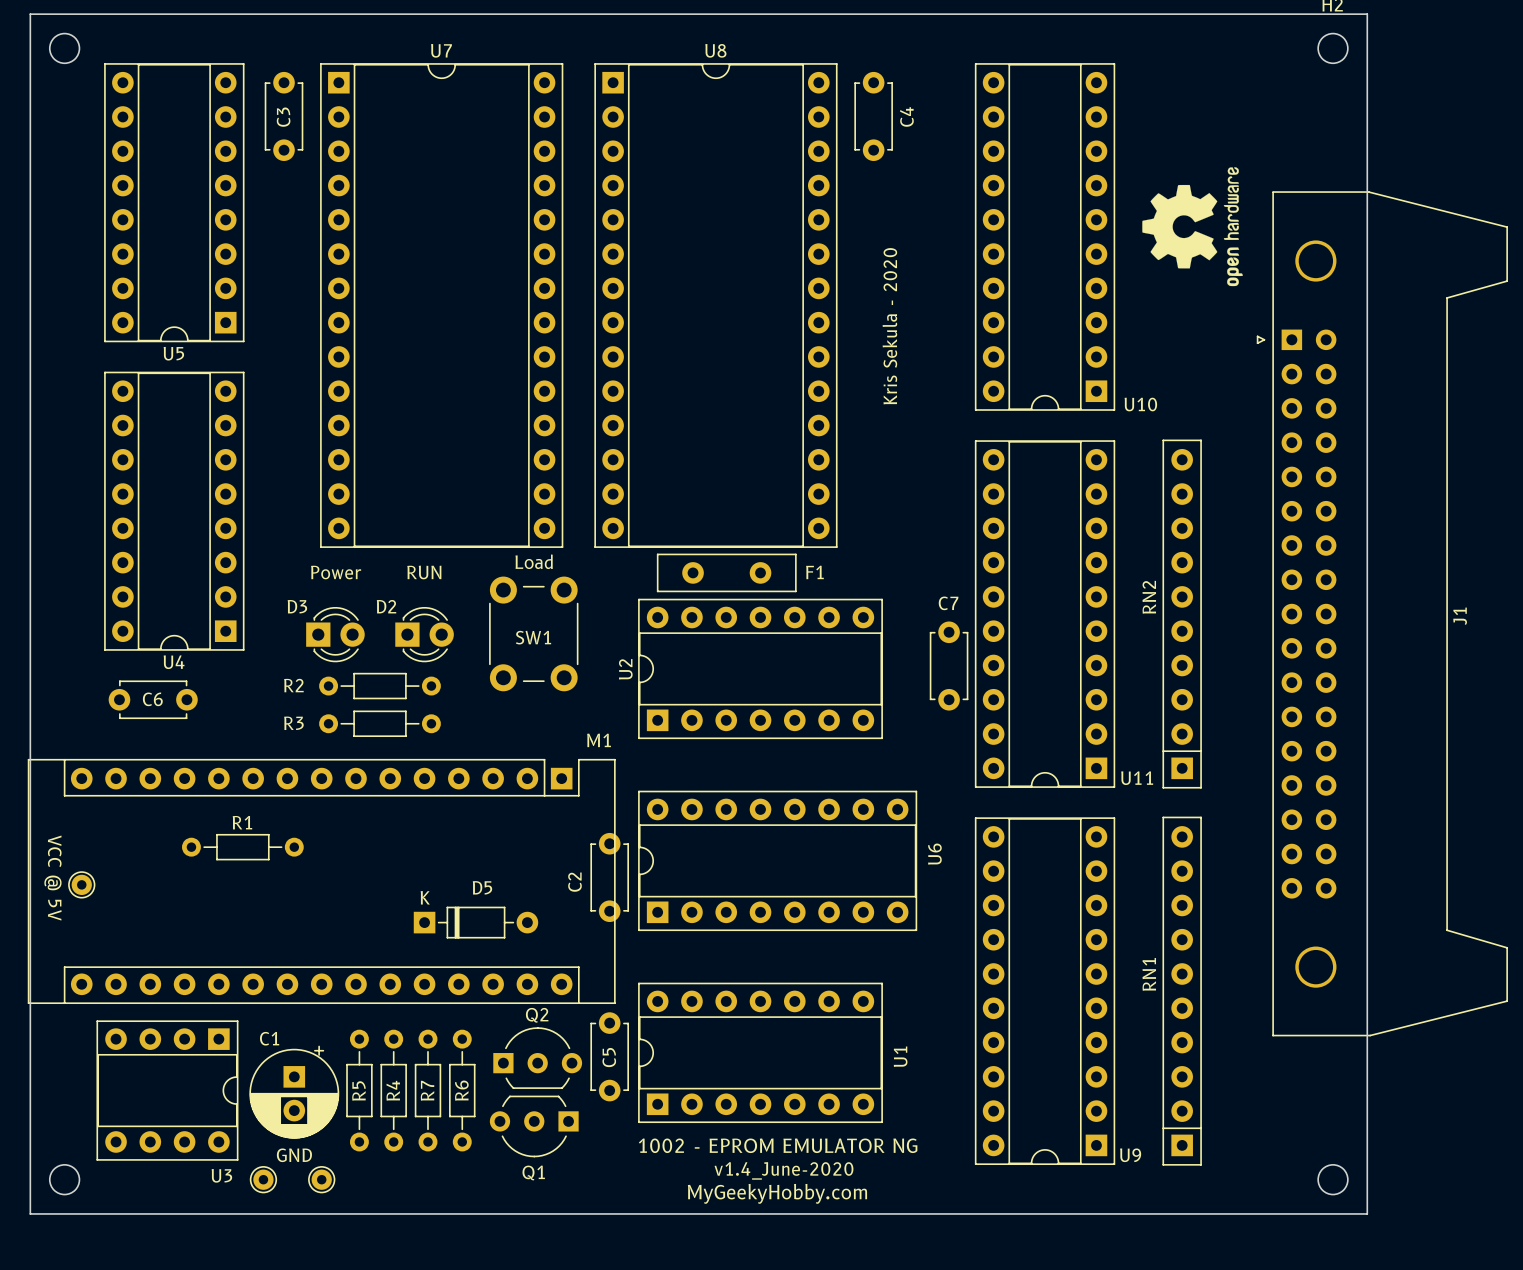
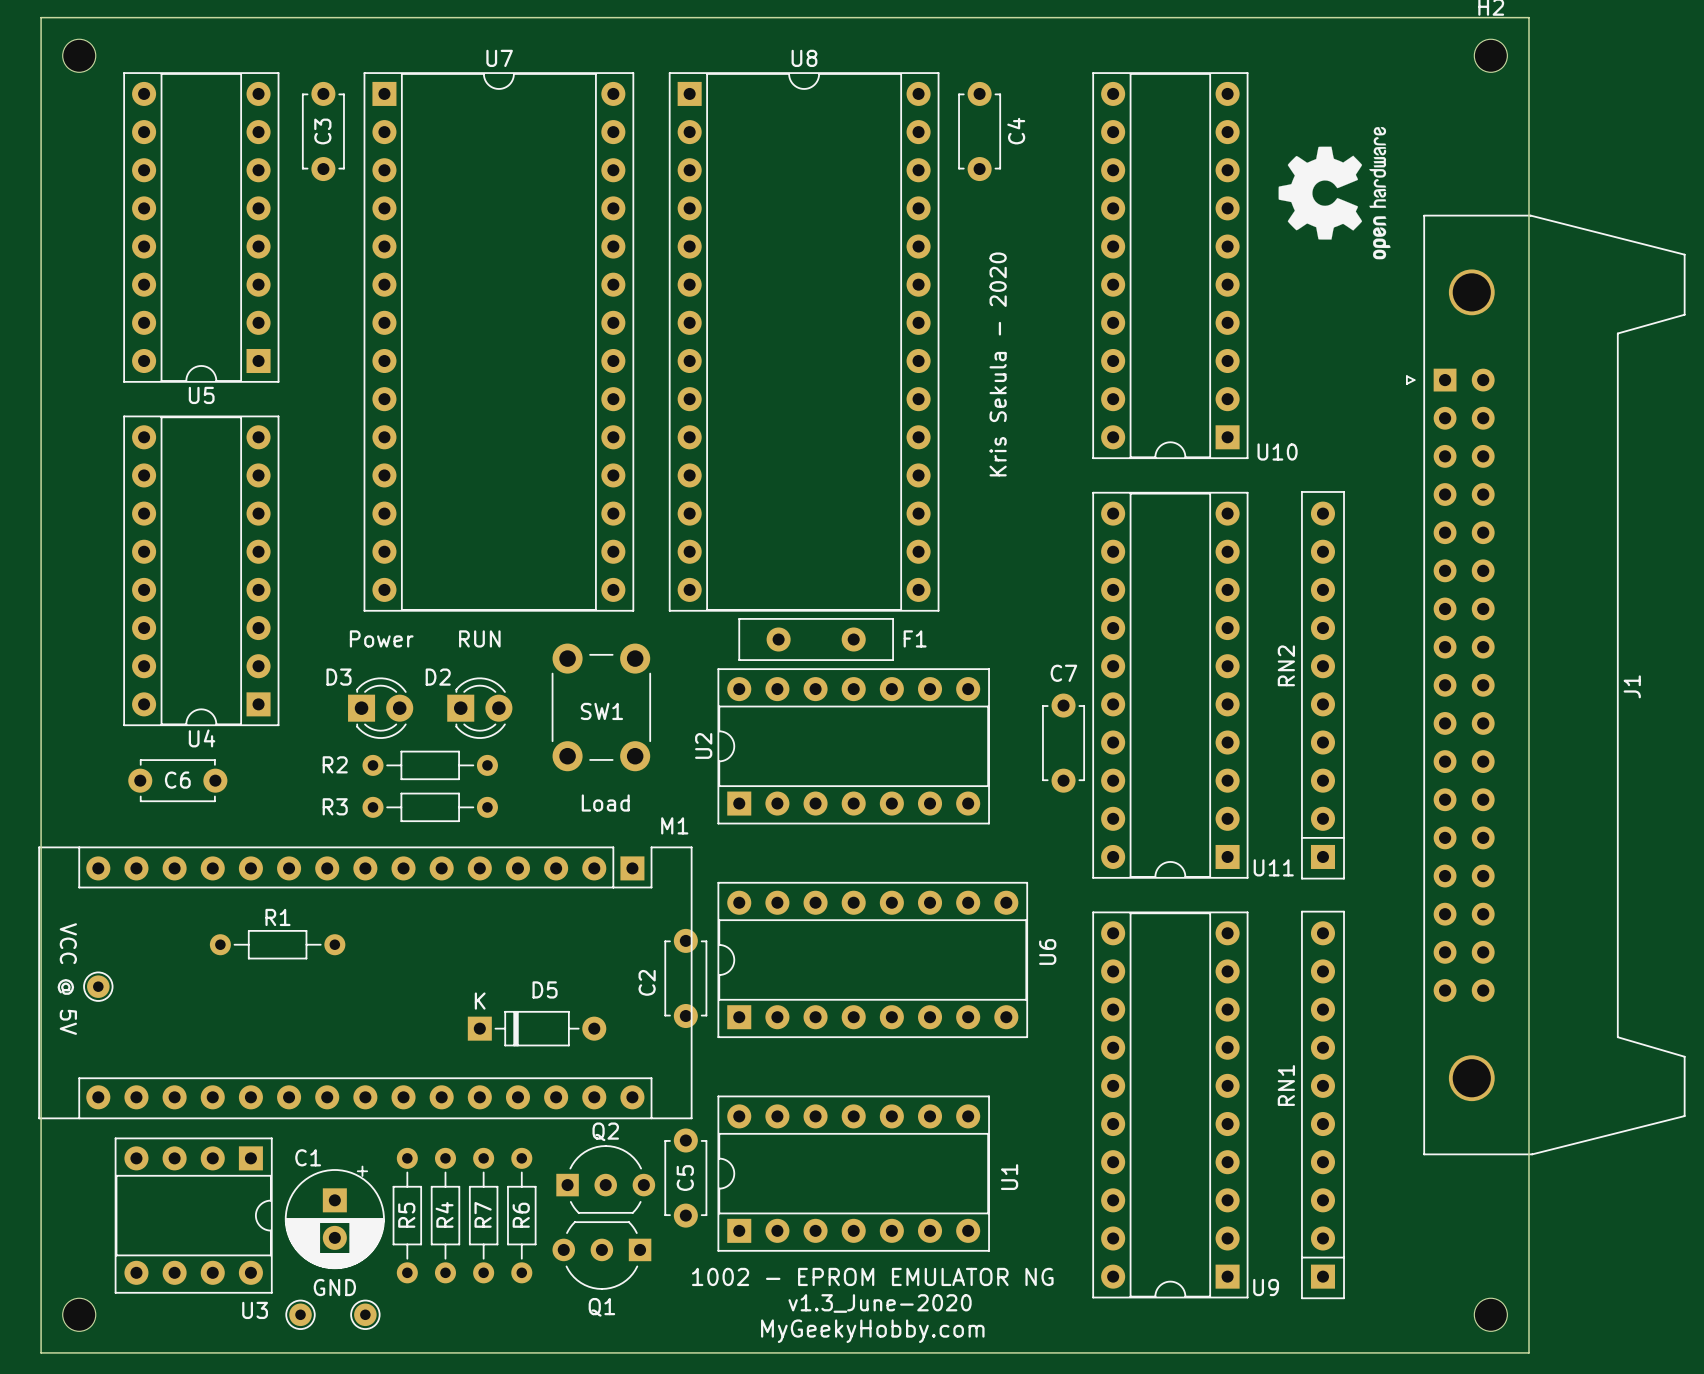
drawing position: (1192, 226) -> (1334, 193)
text position: Load (534, 561) -> Load (605, 802)
text: v1.4_June-2020 (783, 1170) -> v1.3_June-2020 (880, 1303)

